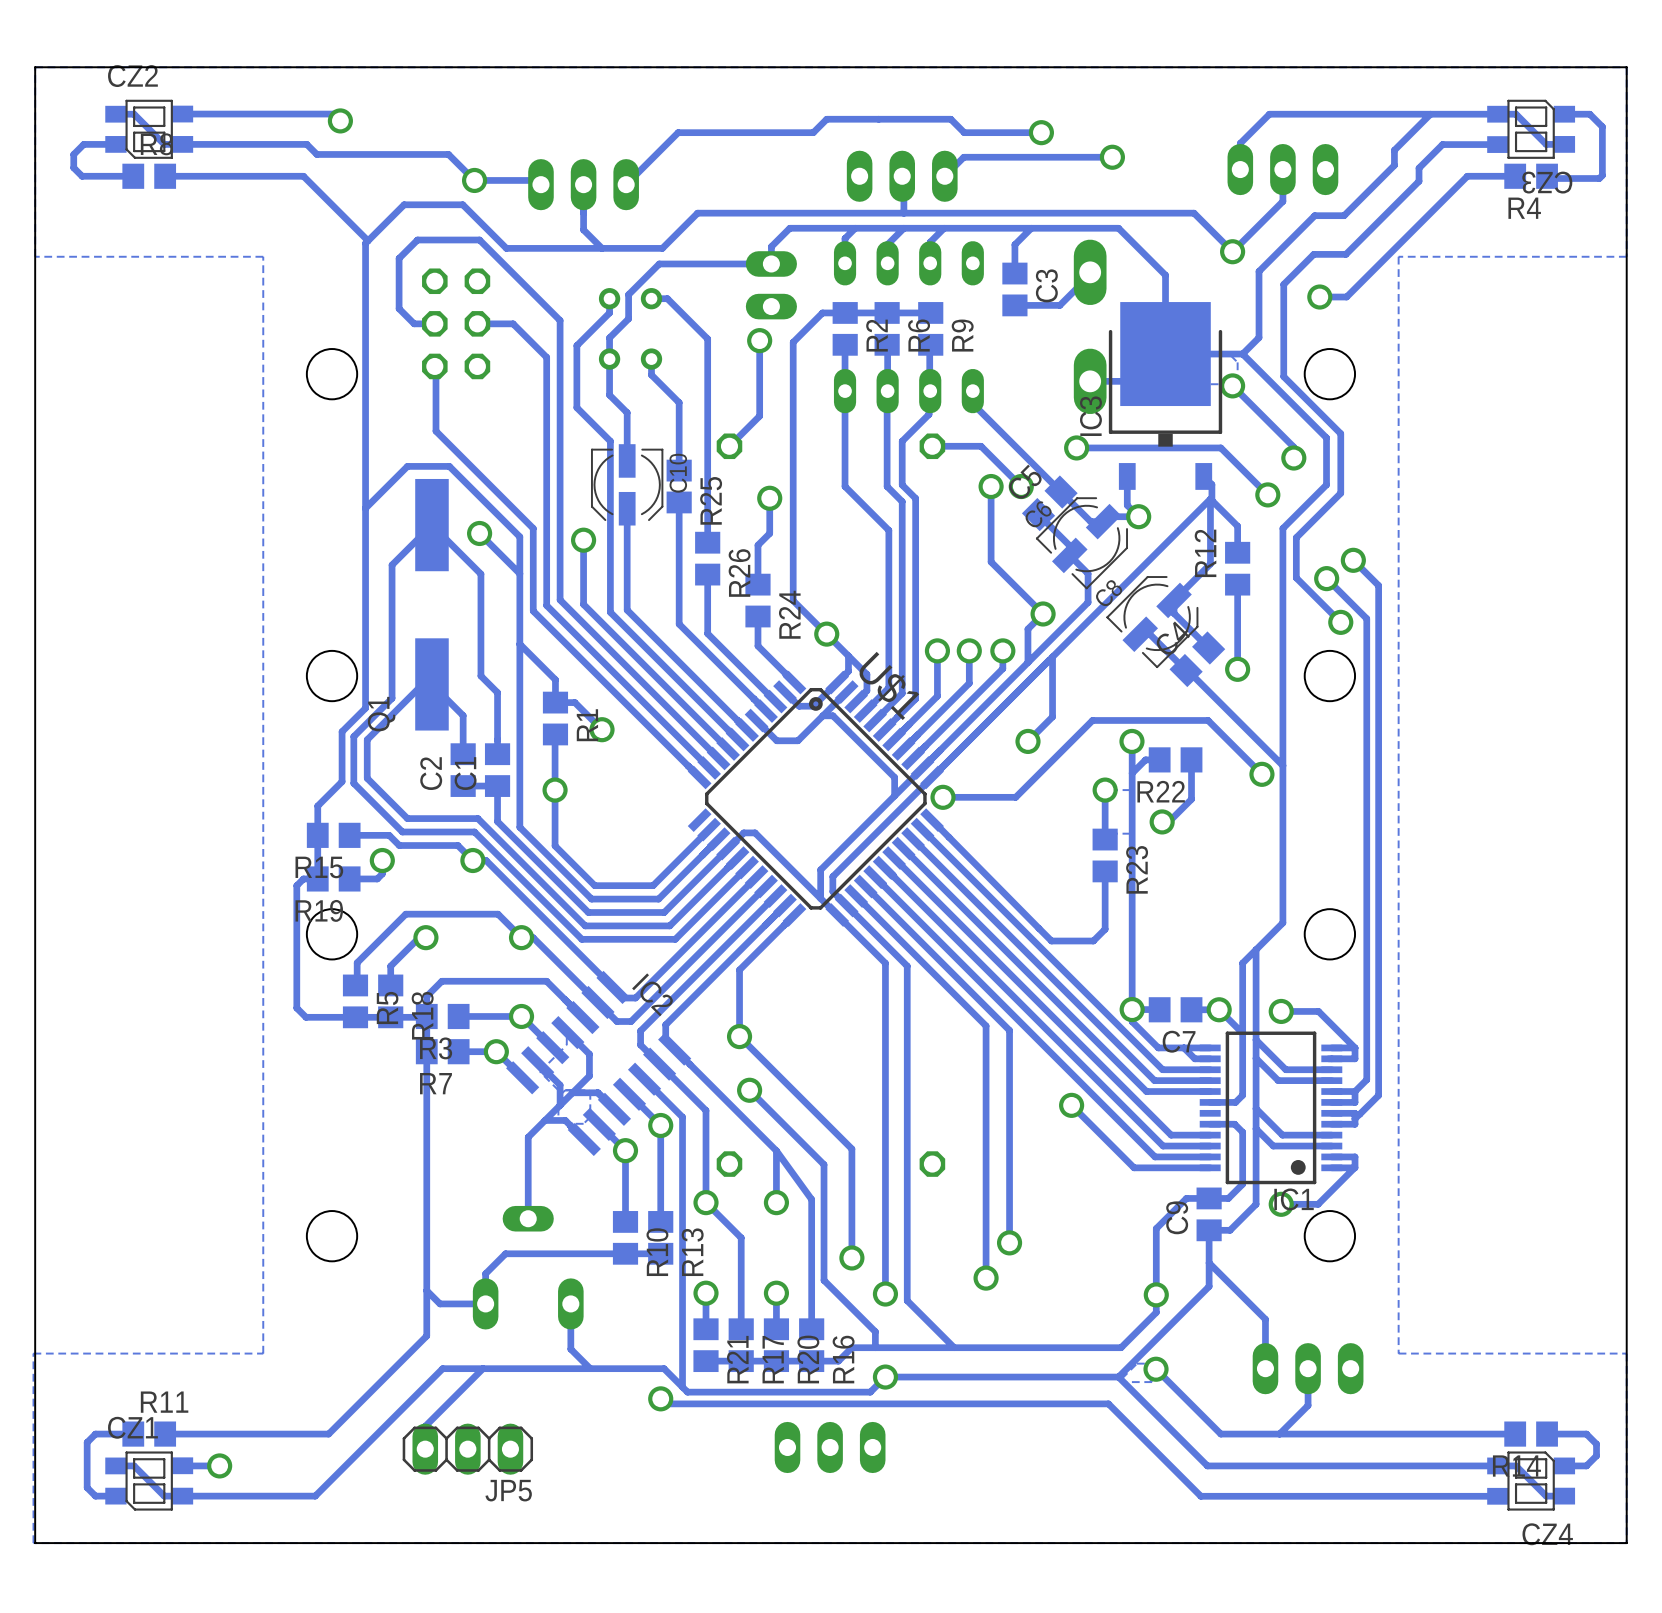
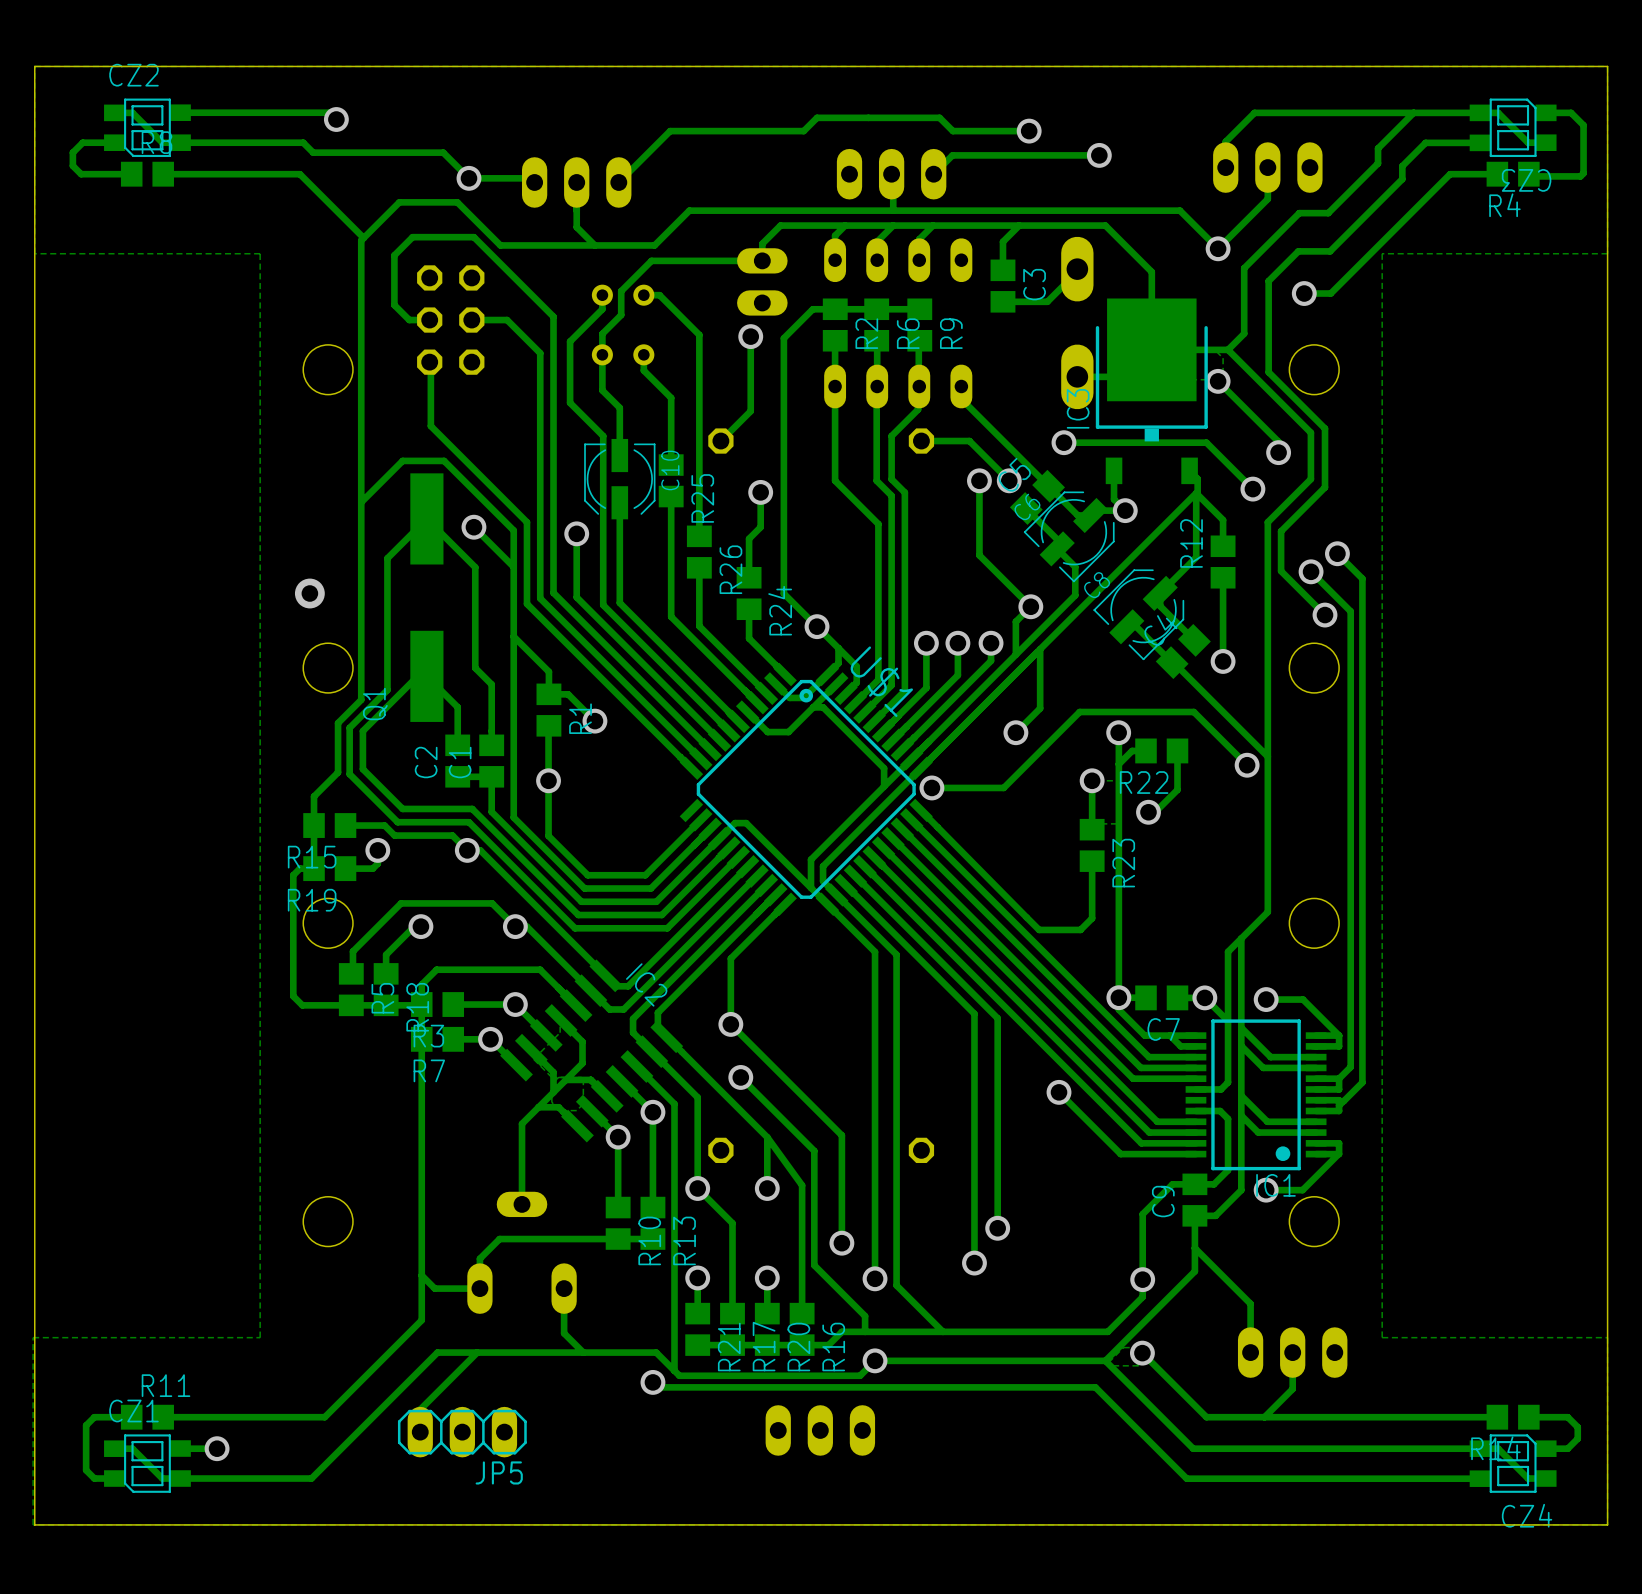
via: none -> (309, 593)

